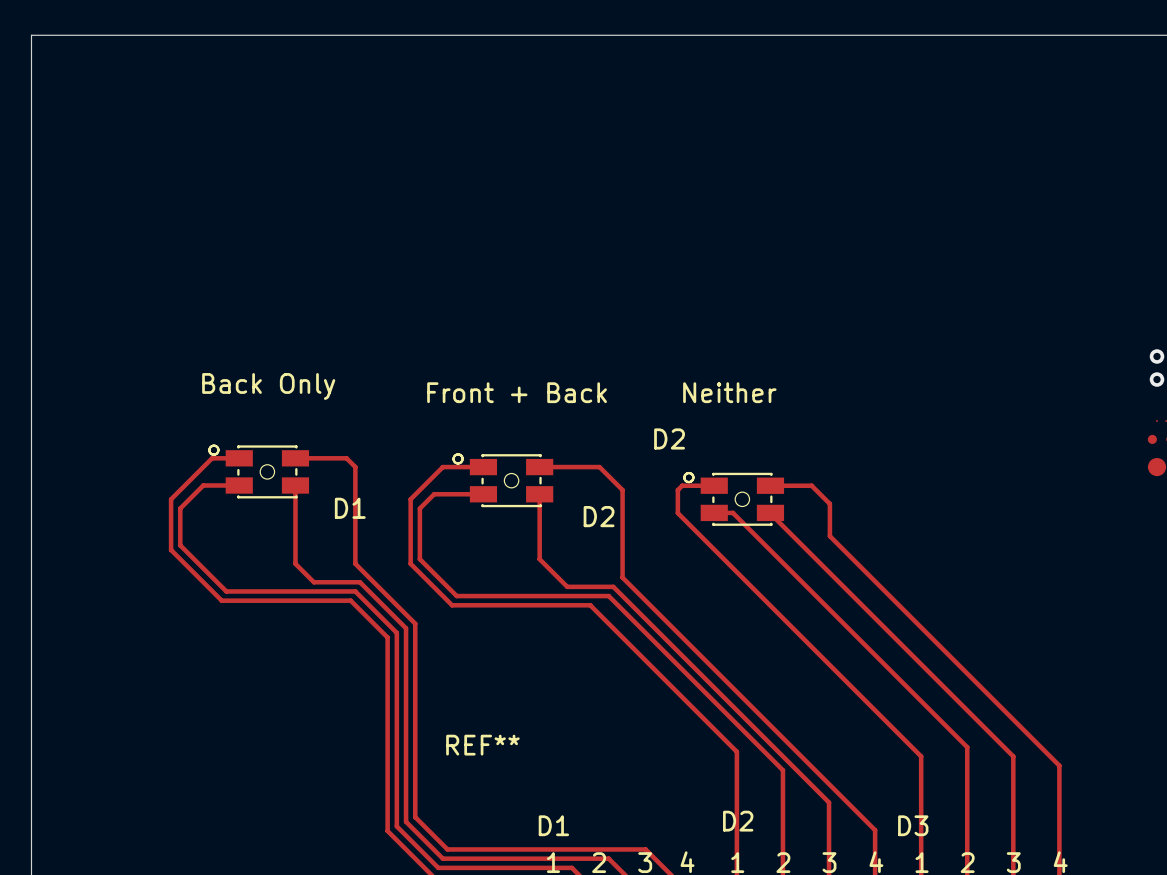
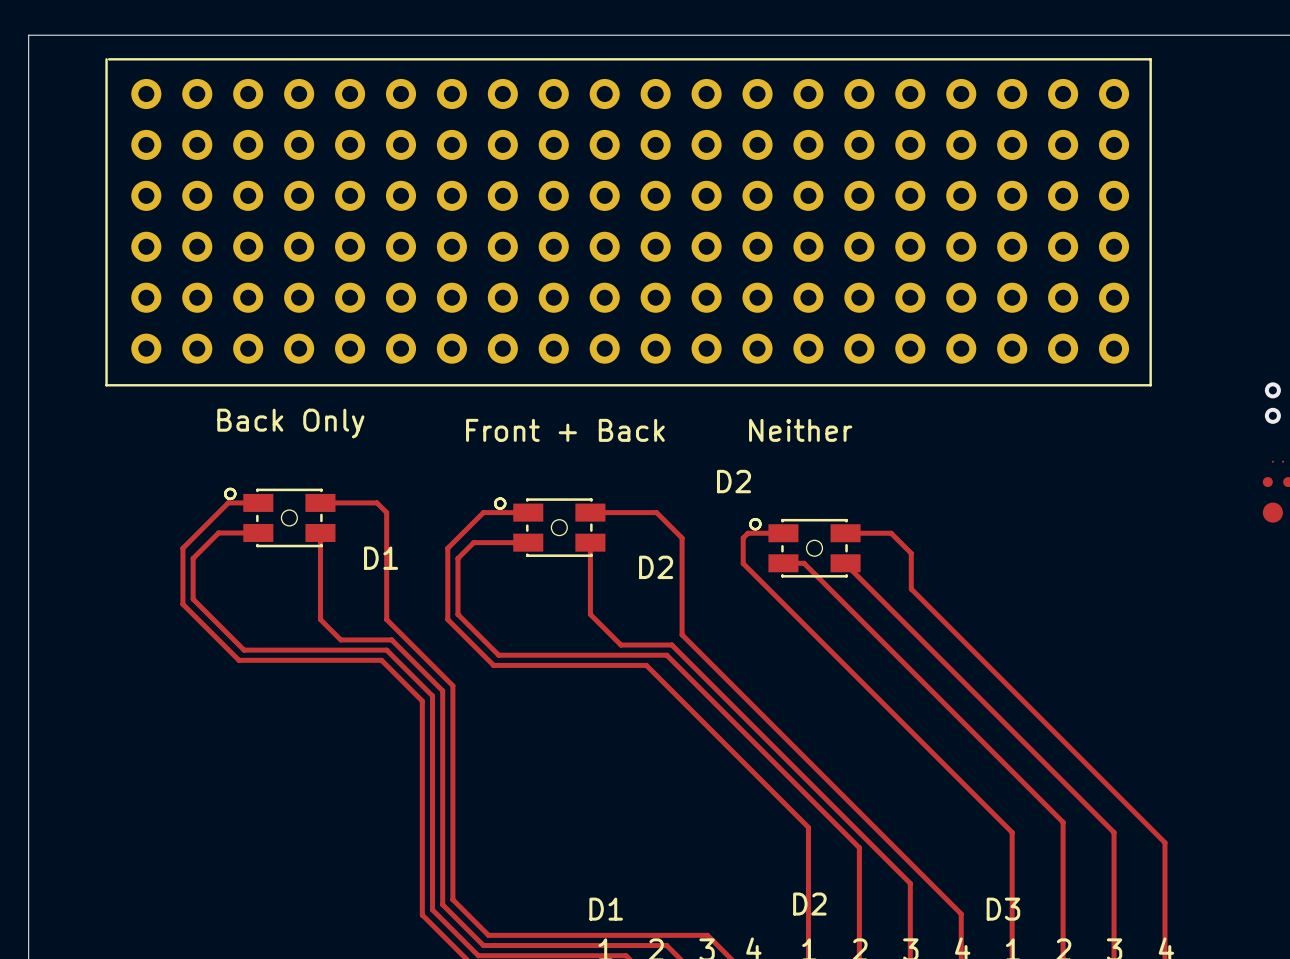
part: none -> (628, 222)
REF** name: REF** (482, 745) -> none

